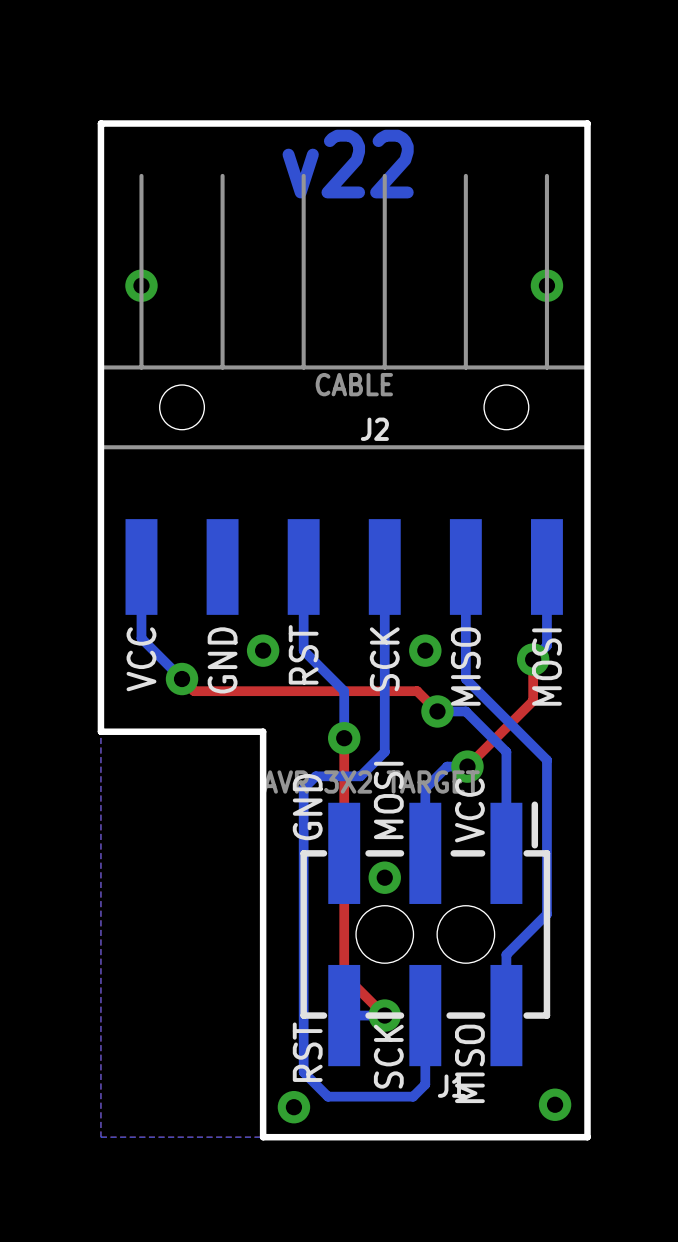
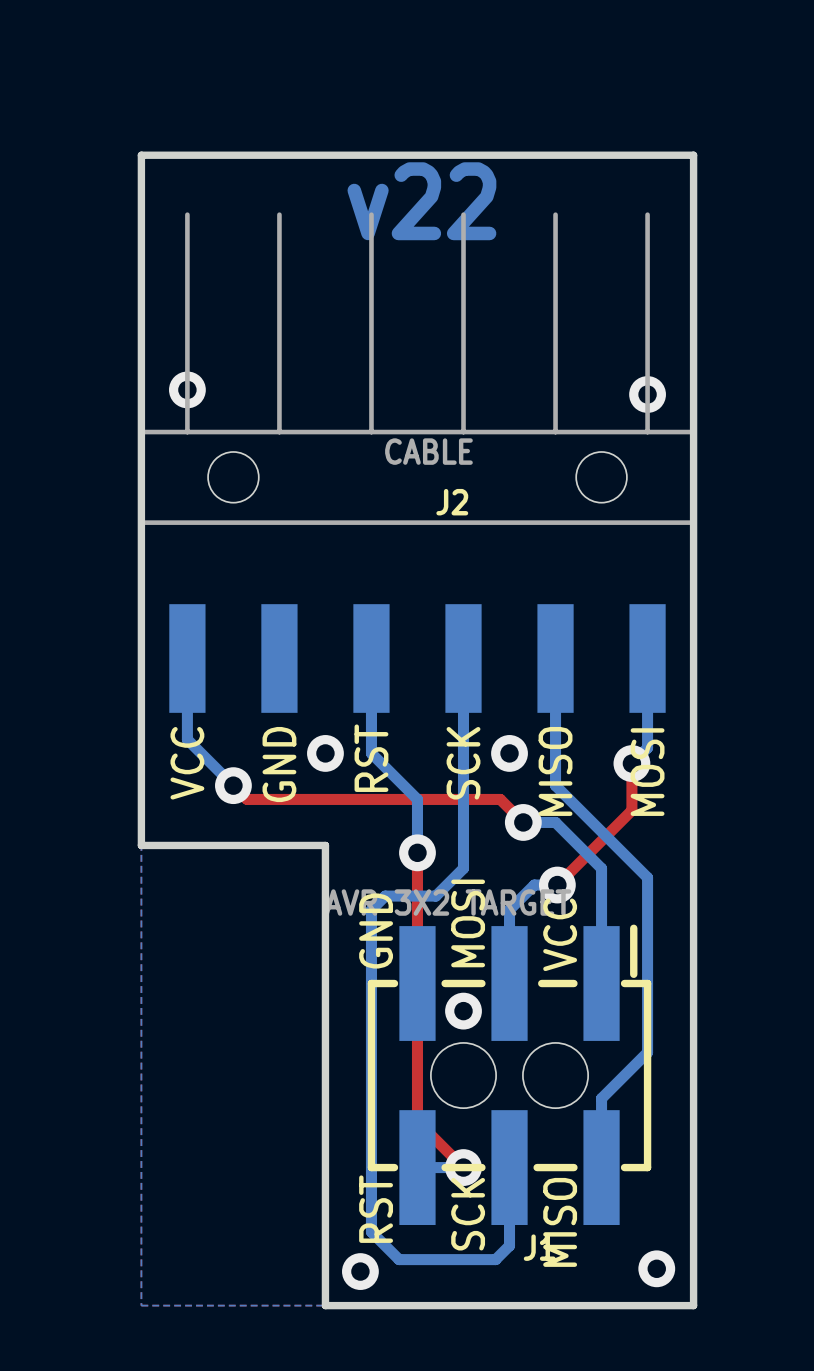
via position: (141, 285) -> (187, 389)
via position: (546, 285) -> (647, 394)

